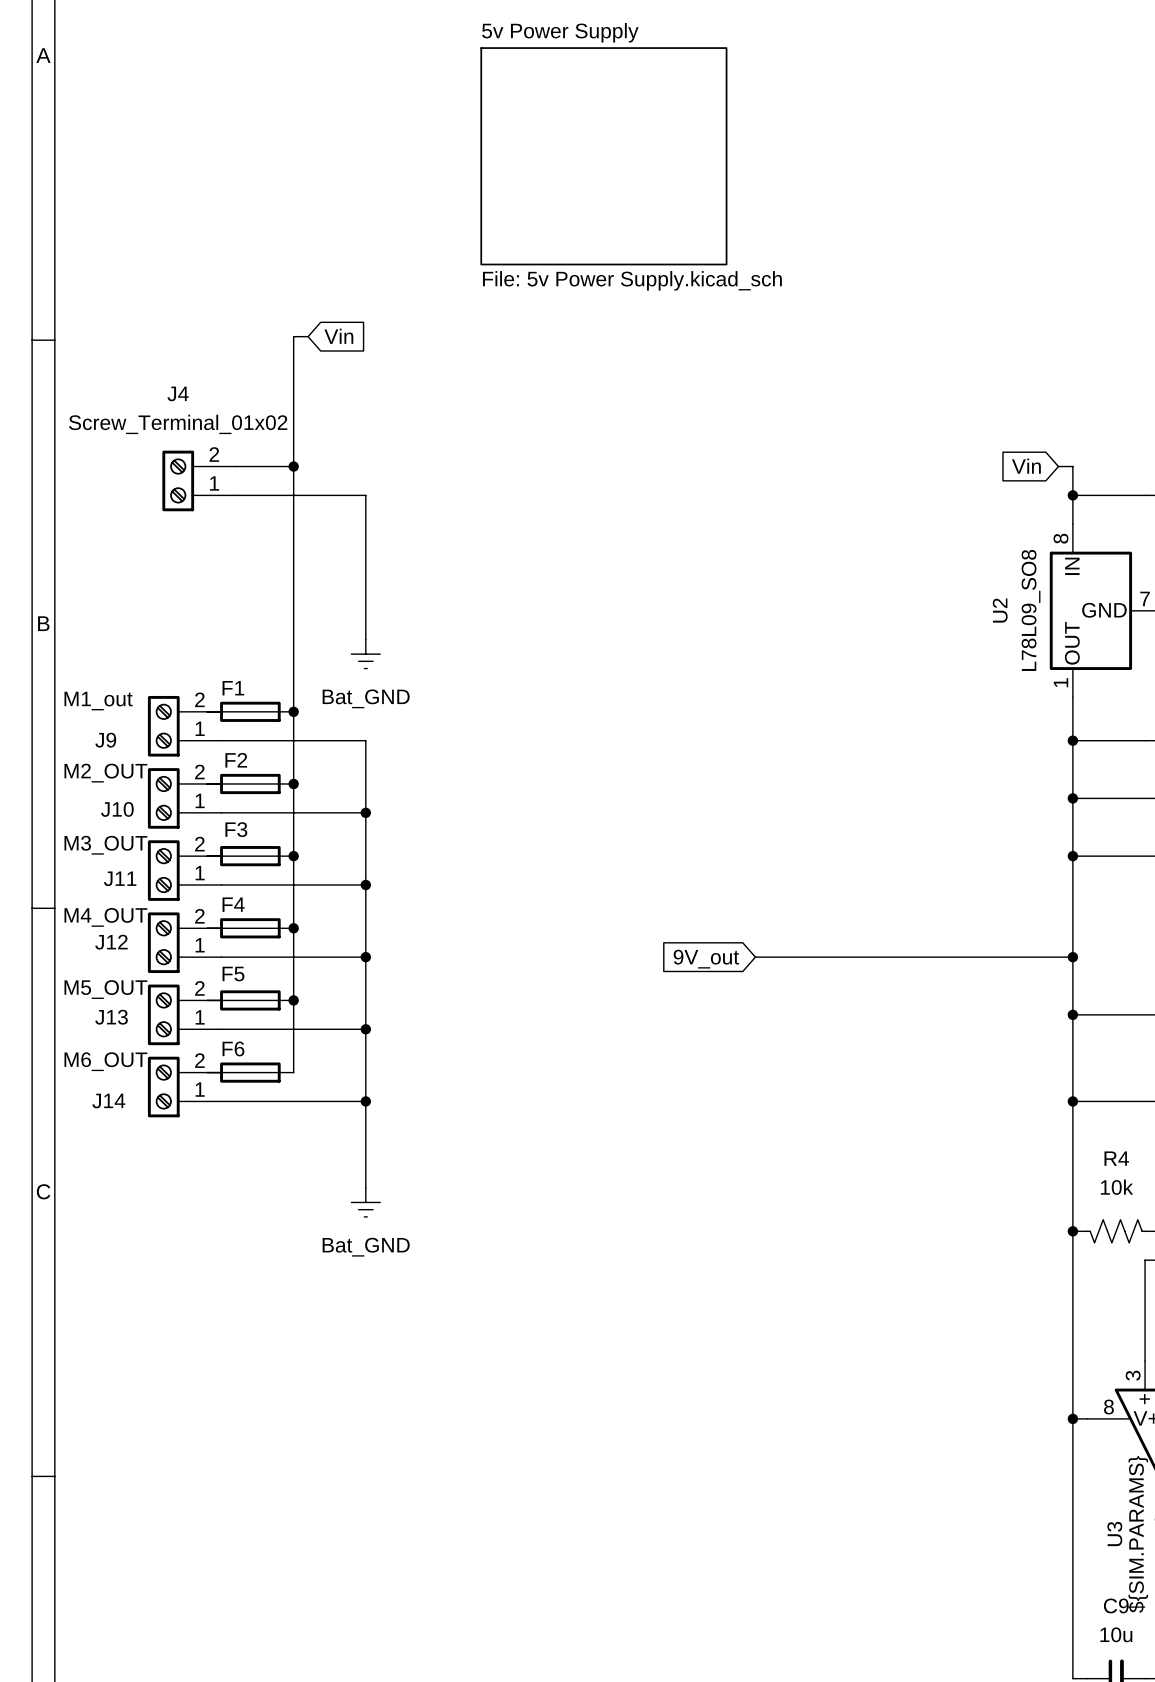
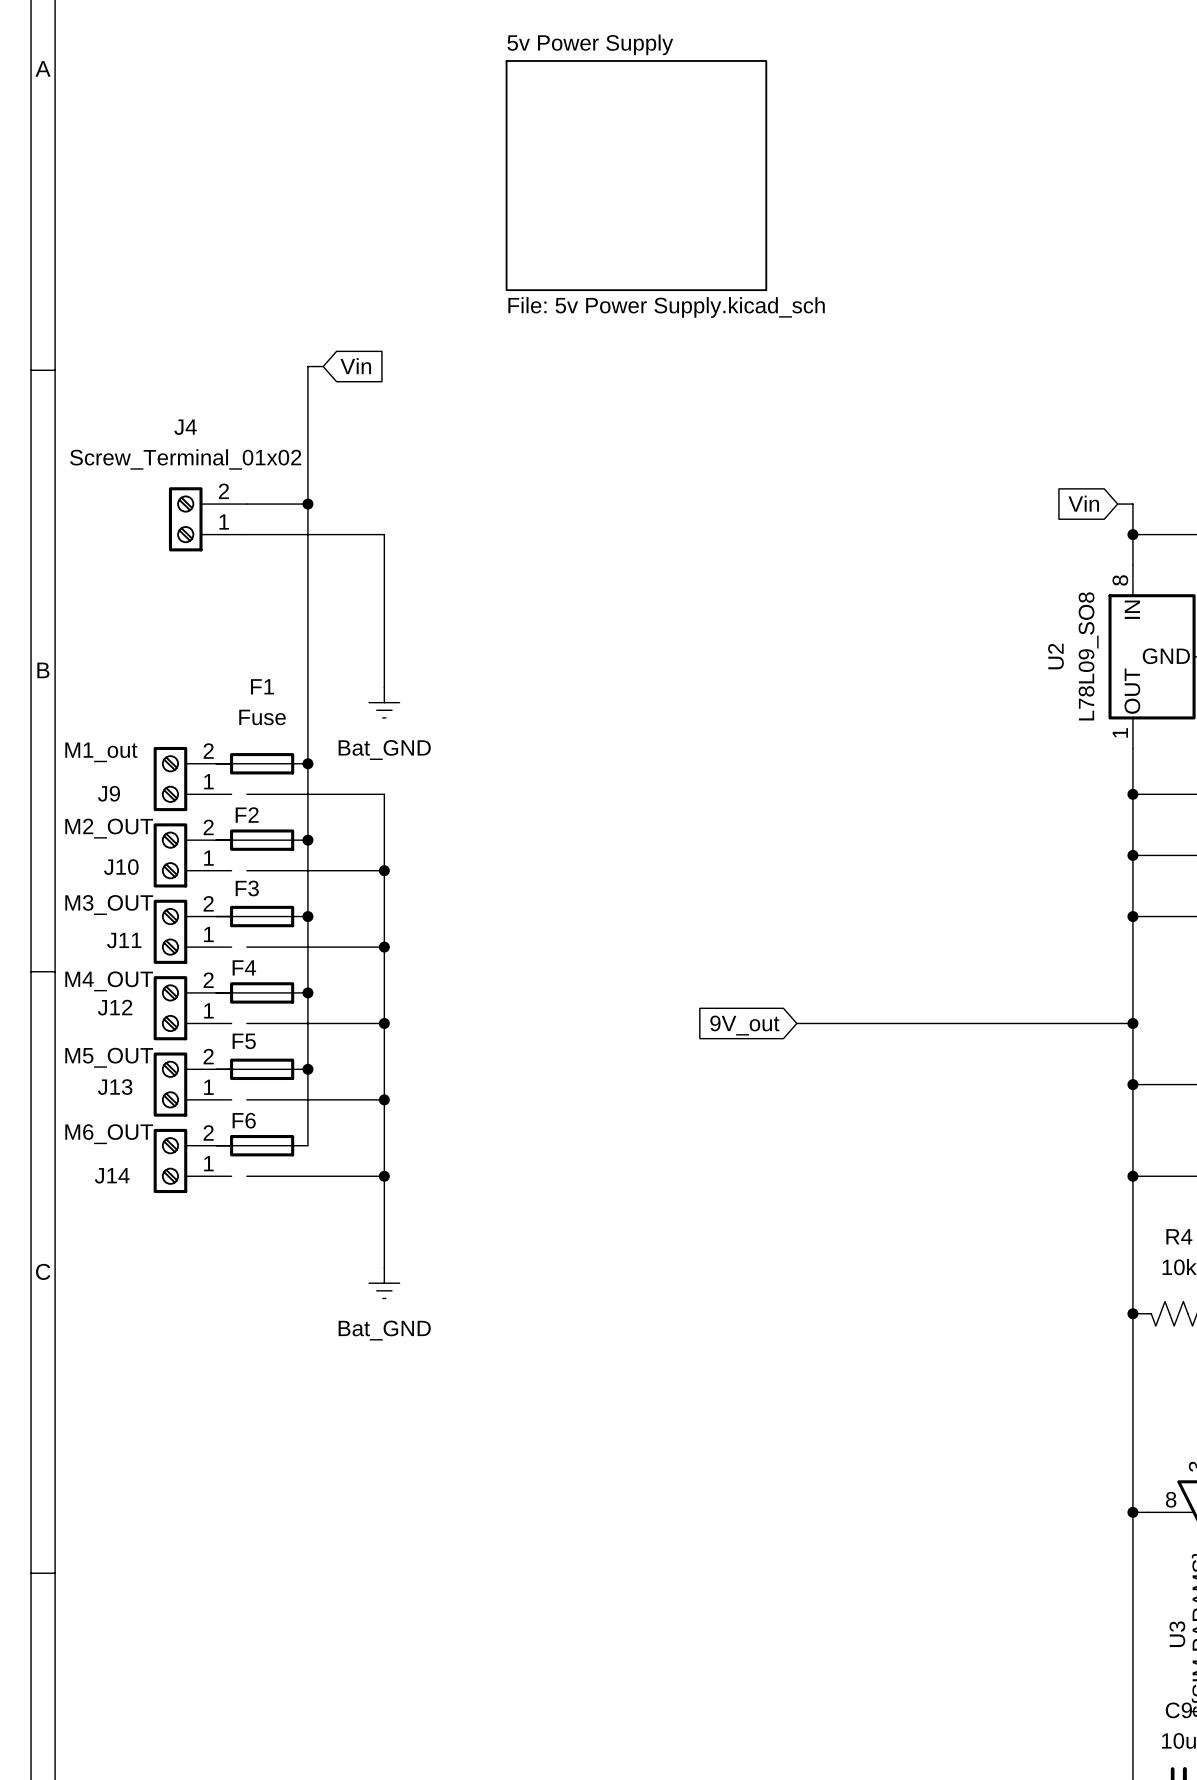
F1 value: none -> Fuse (262, 717)
F1 name position: F1 (233, 688) -> F1 (262, 686)
wire: (221, 740) (235, 740) -> none
wire: (221, 812) (235, 812) -> none
wire: (221, 885) (235, 885) -> none
wire: (221, 957) (235, 957) -> none
wire: (221, 1029) (235, 1029) -> none
wire: (221, 1101) (235, 1101) -> none

